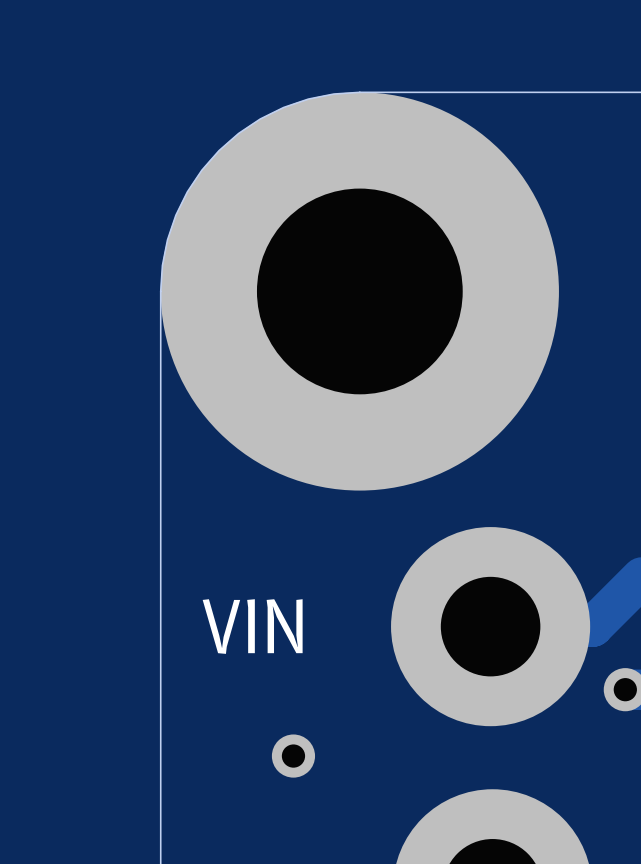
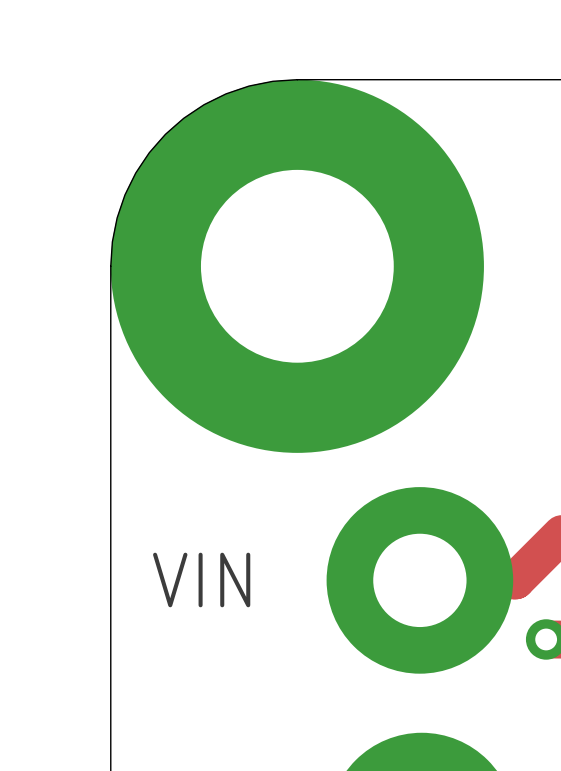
via: (293, 756) -> none

